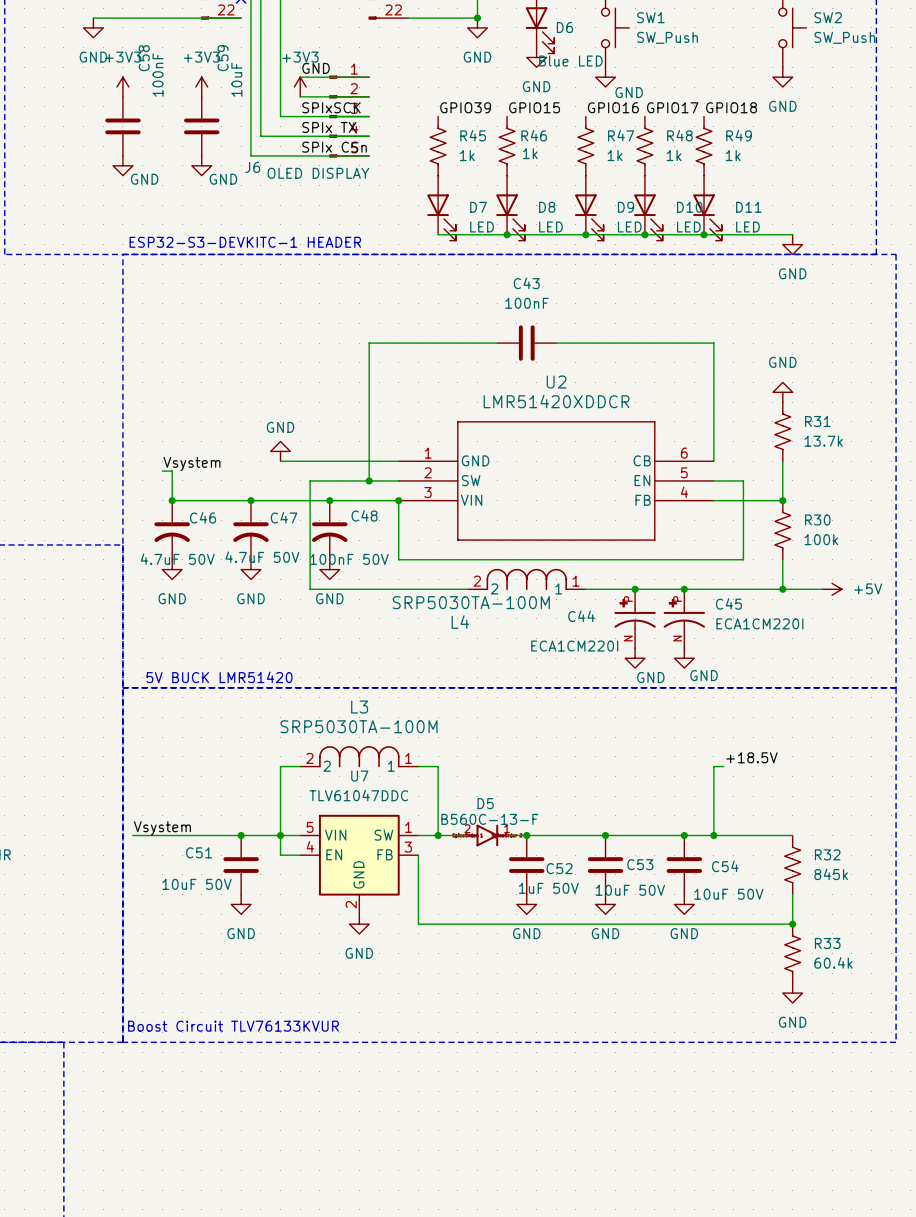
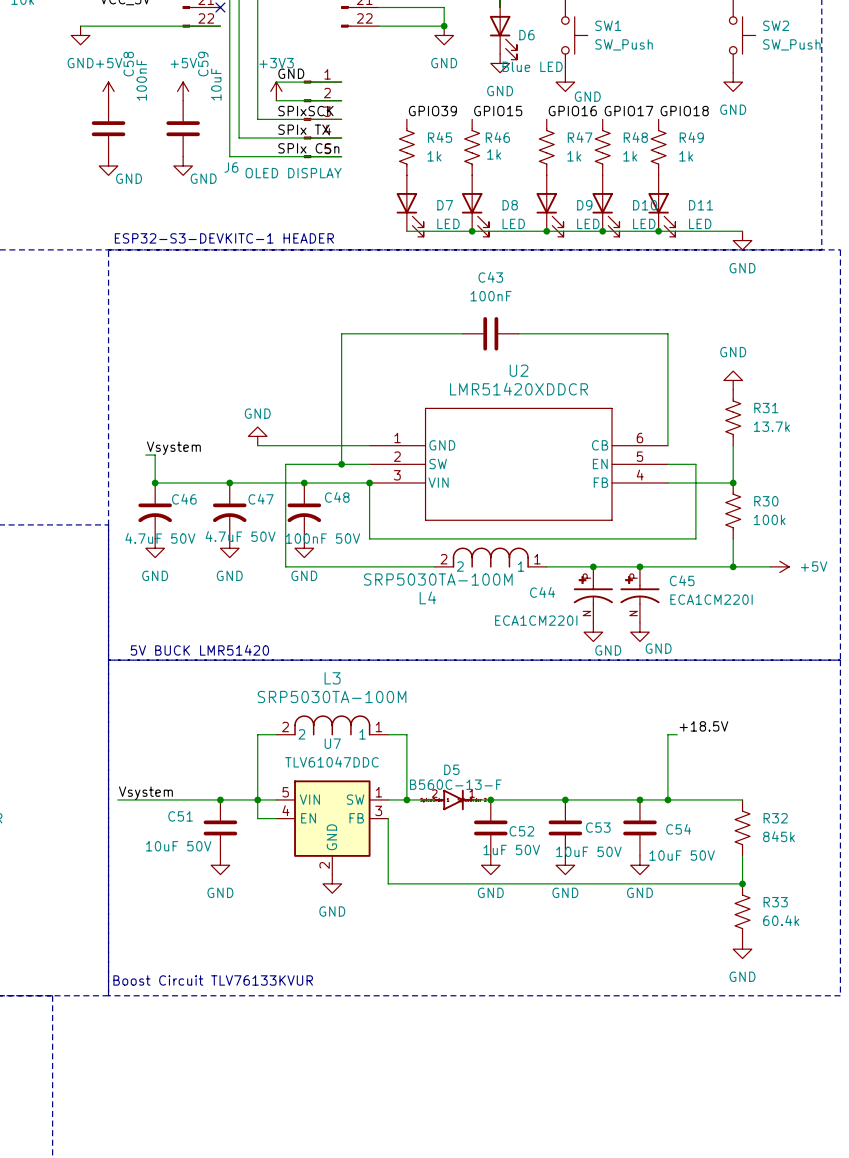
power symbol: +3V3 (122, 87) -> +5V (108, 91)
power symbol: +3V3 (201, 87) -> +5V (183, 91)

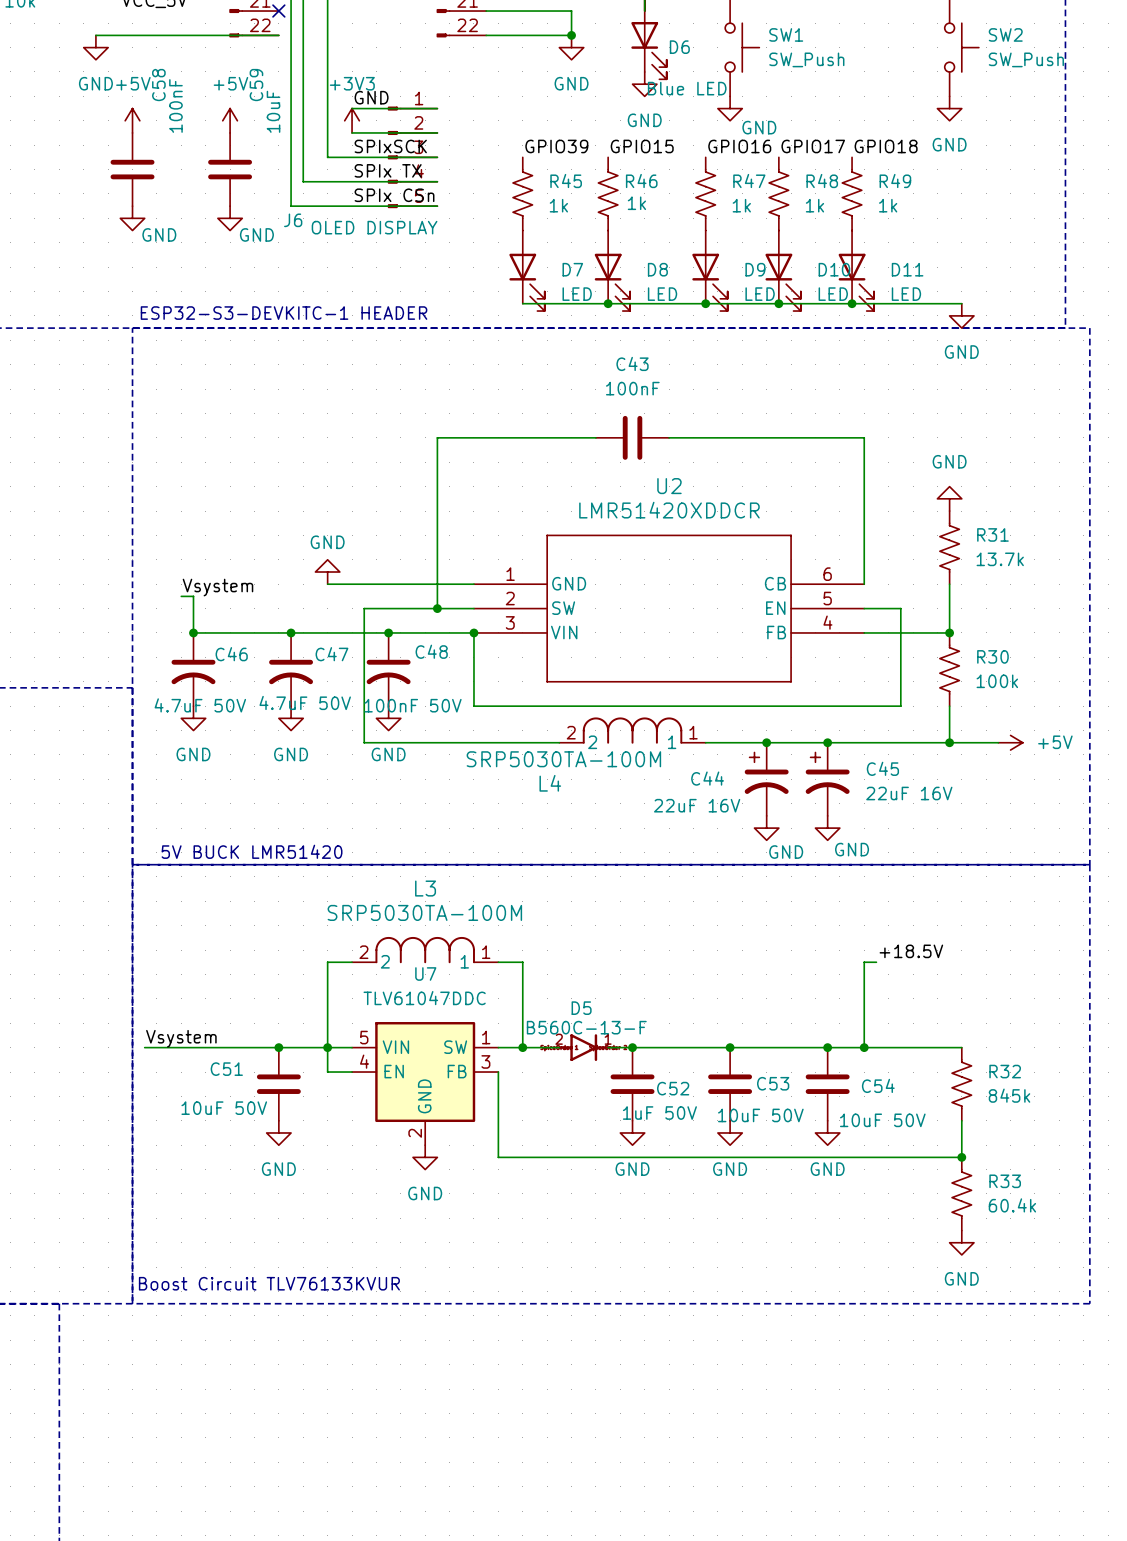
C44 symbol: [573, 566, 613, 623] -> [744, 742, 789, 816]
C45 symbol: [620, 566, 660, 623] -> [805, 742, 850, 816]
C45 value: ECA1CM220I (711, 599) -> 22uF 16V (909, 793)
C44 value: ECA1CM220I (536, 620) -> 22uF 16V (697, 805)

